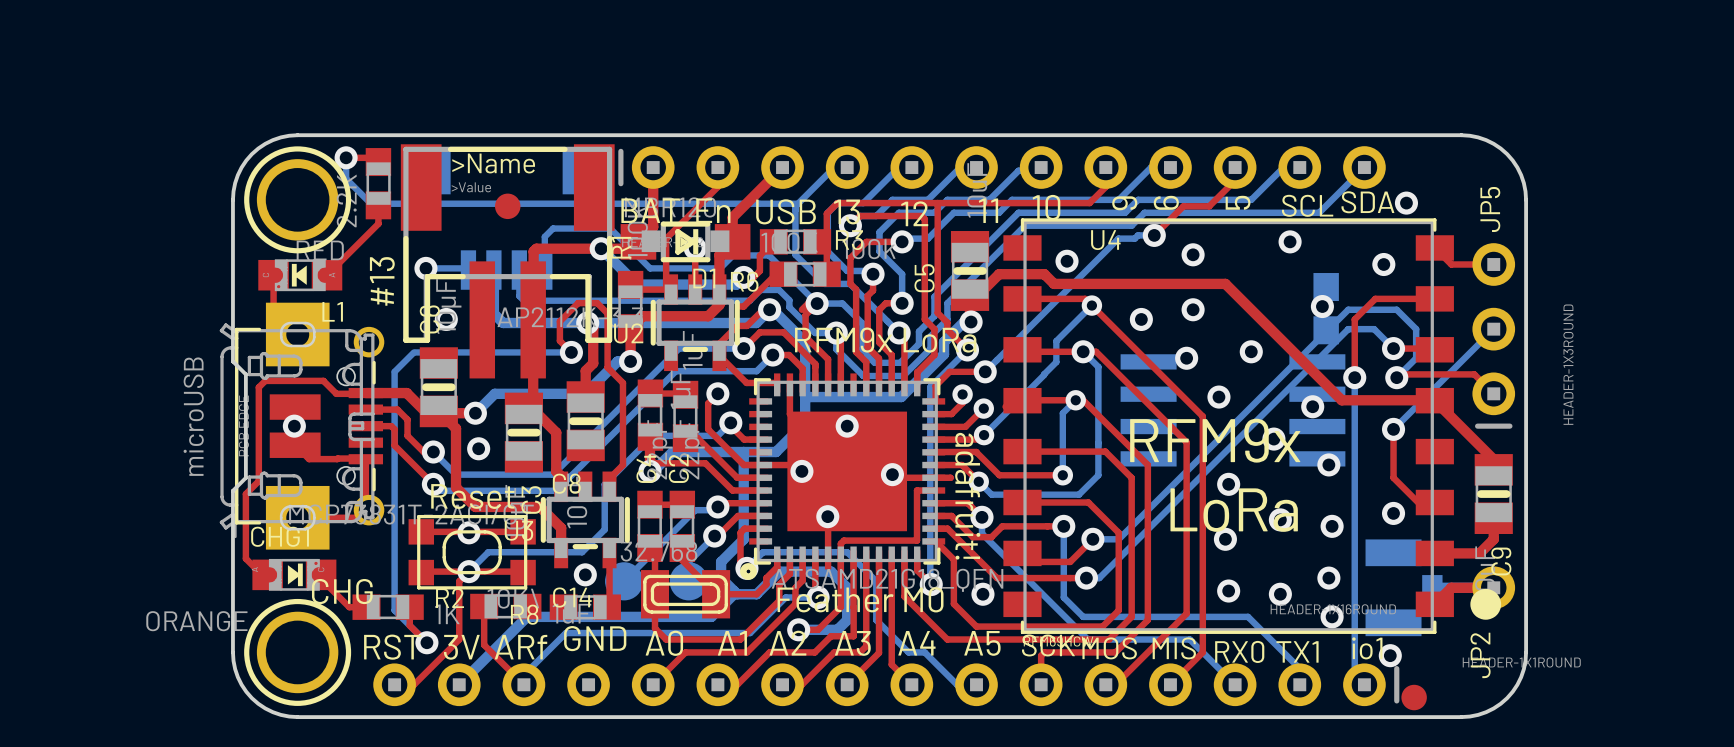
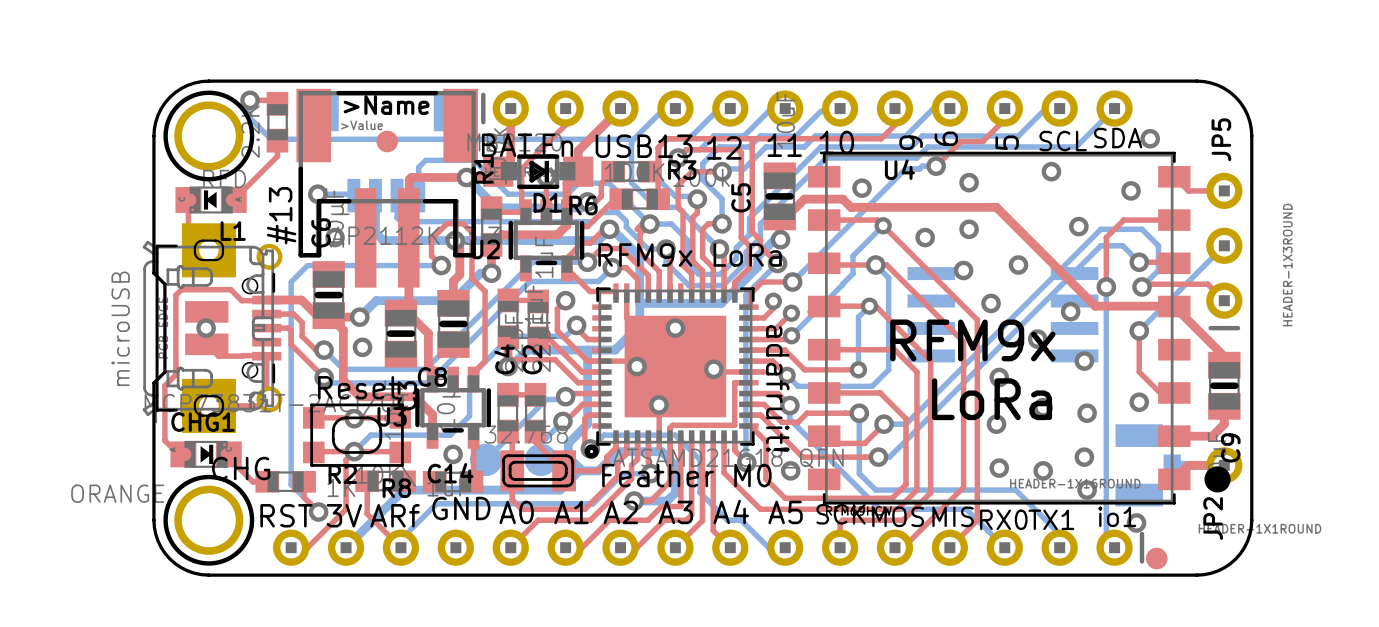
part: (1326, 308) -> none

